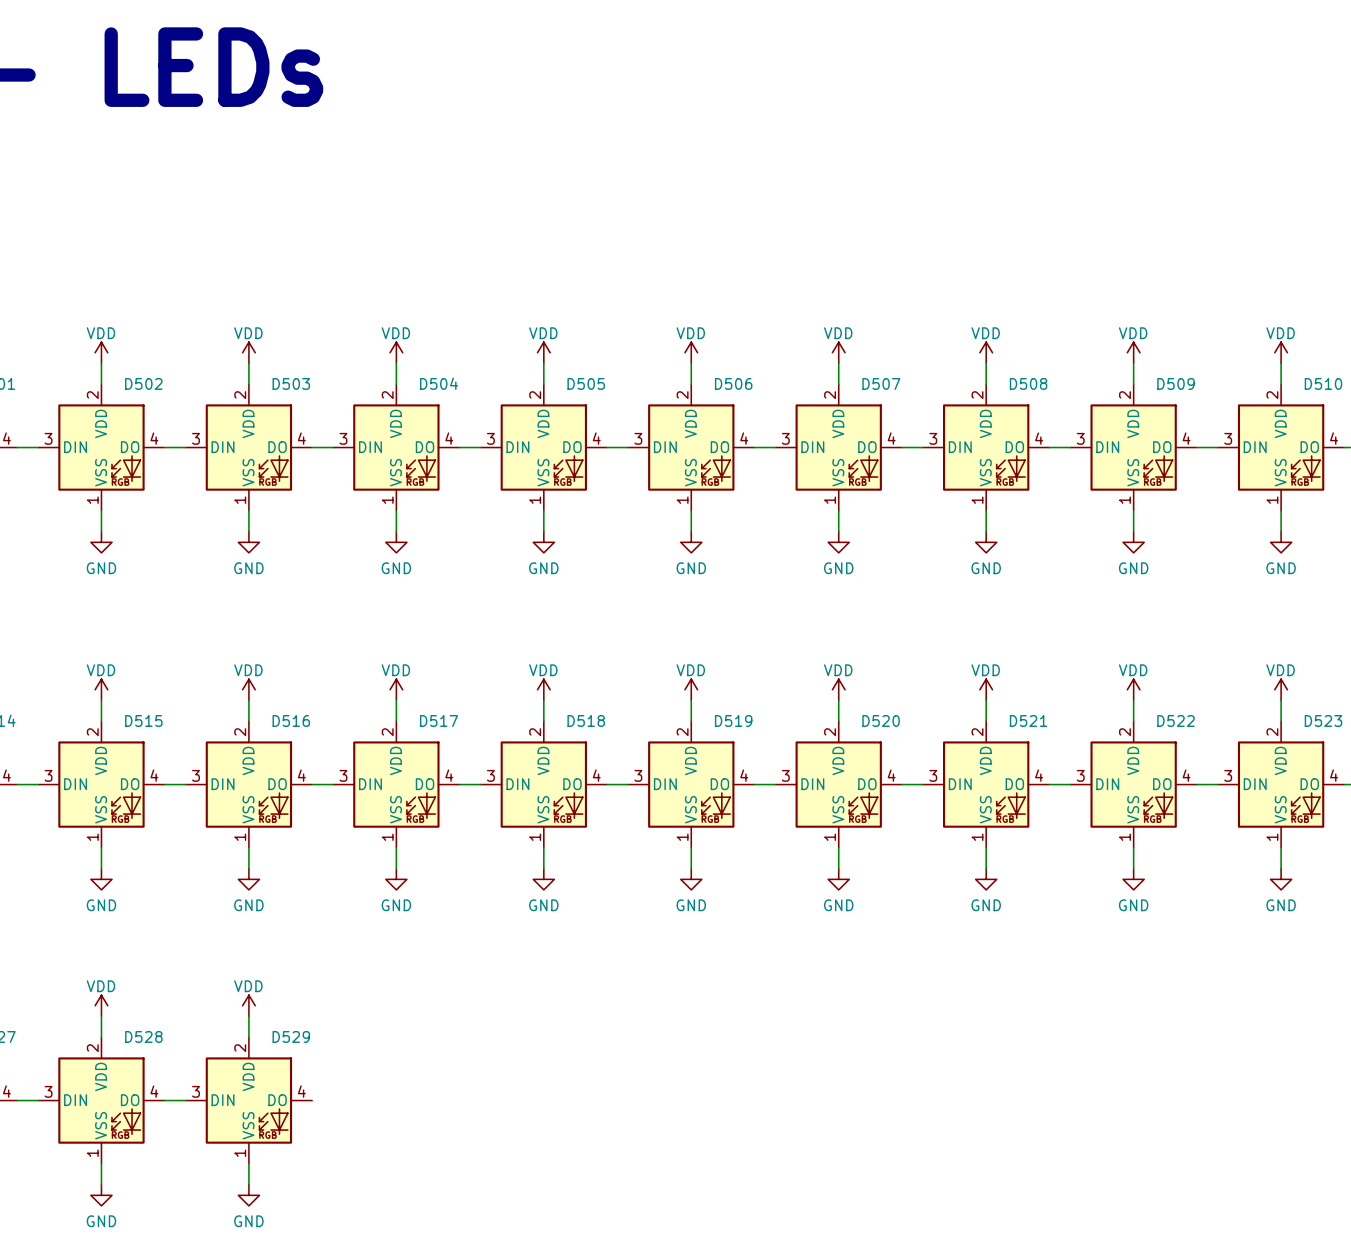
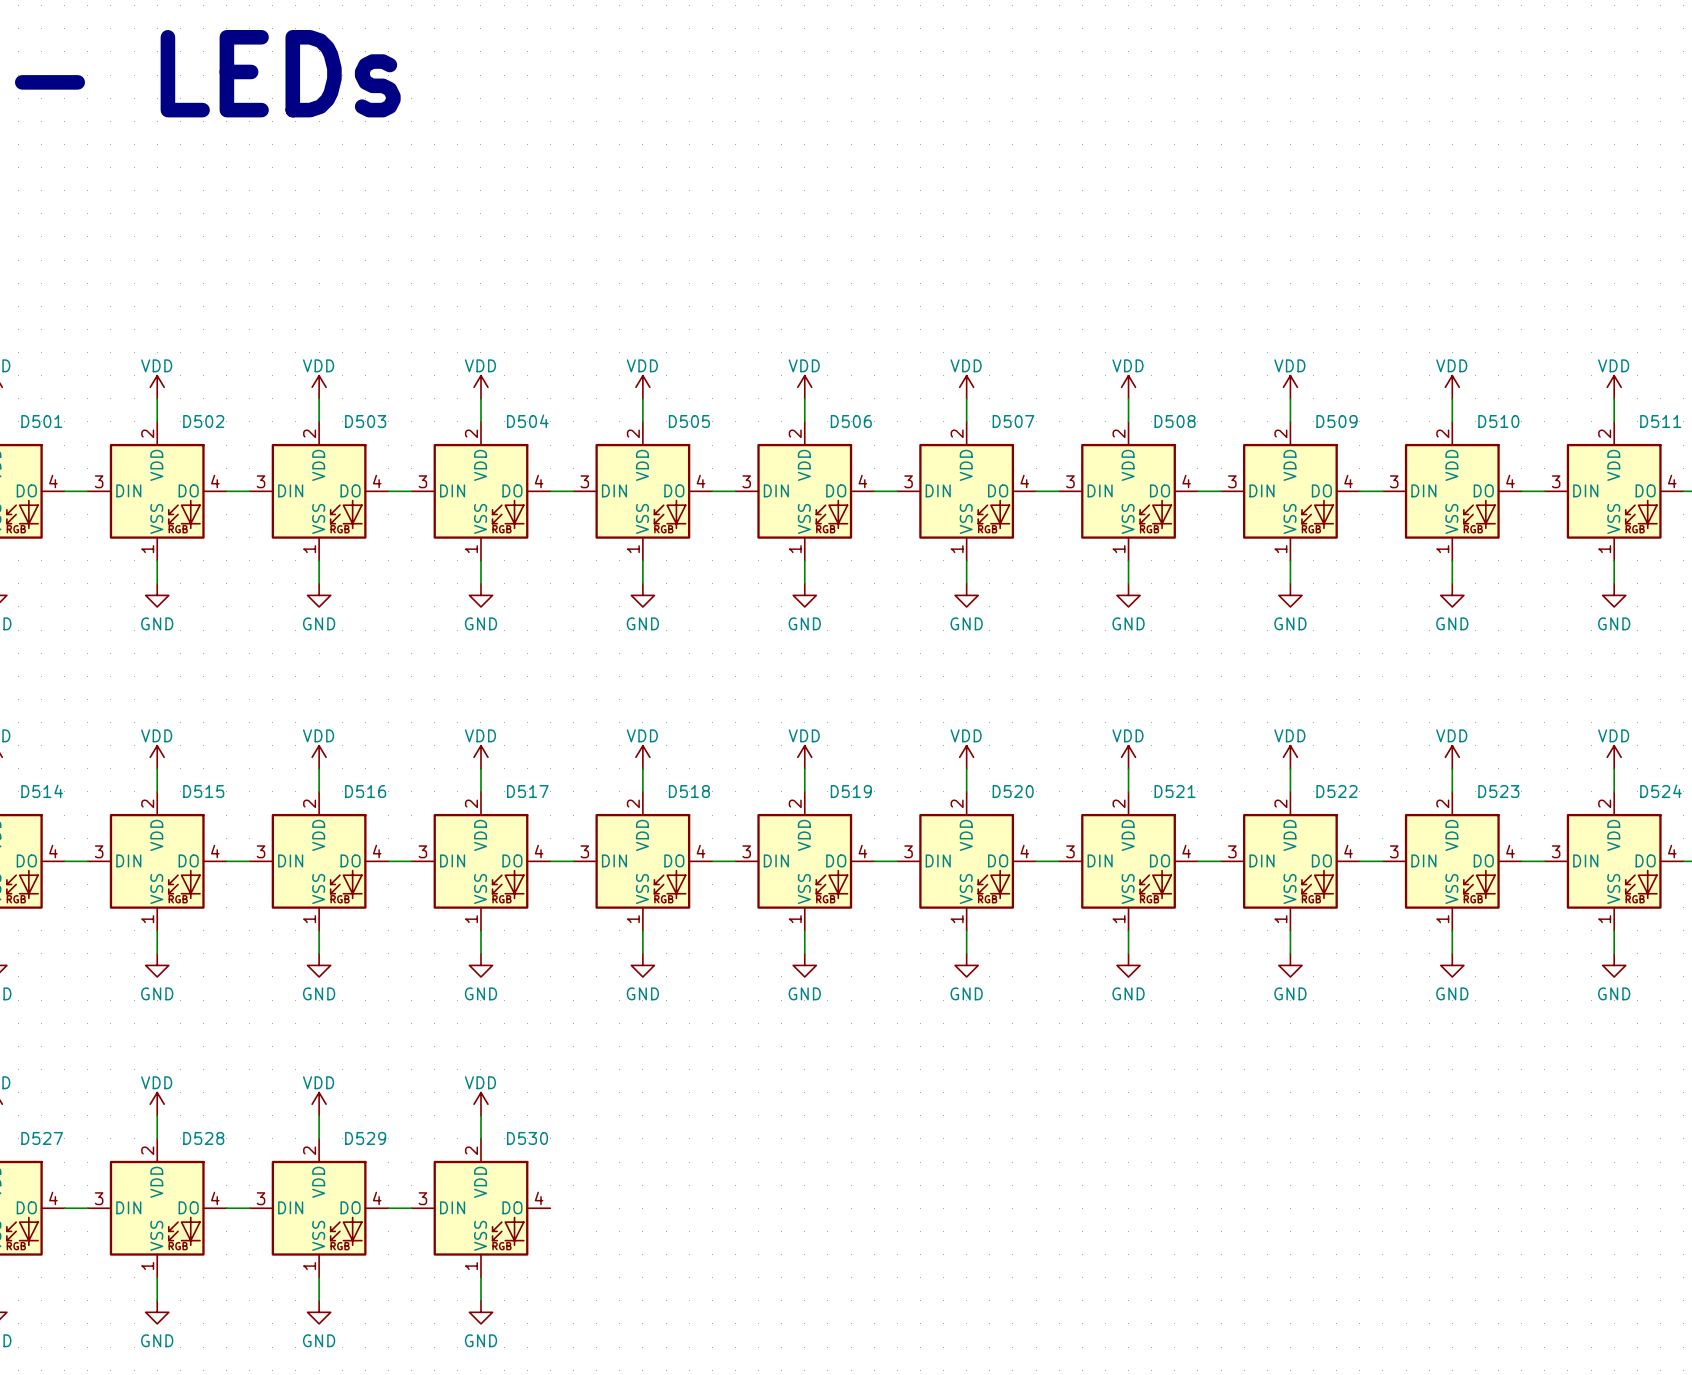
power symbol: none -> VDD (480, 1104)
wire: none -> (480, 1115) (480, 1138)
wire: none -> (388, 1208) (411, 1208)
D530: none -> (480, 1208)
wire: none -> (480, 1277) (480, 1300)
power symbol: none -> GND (480, 1312)

